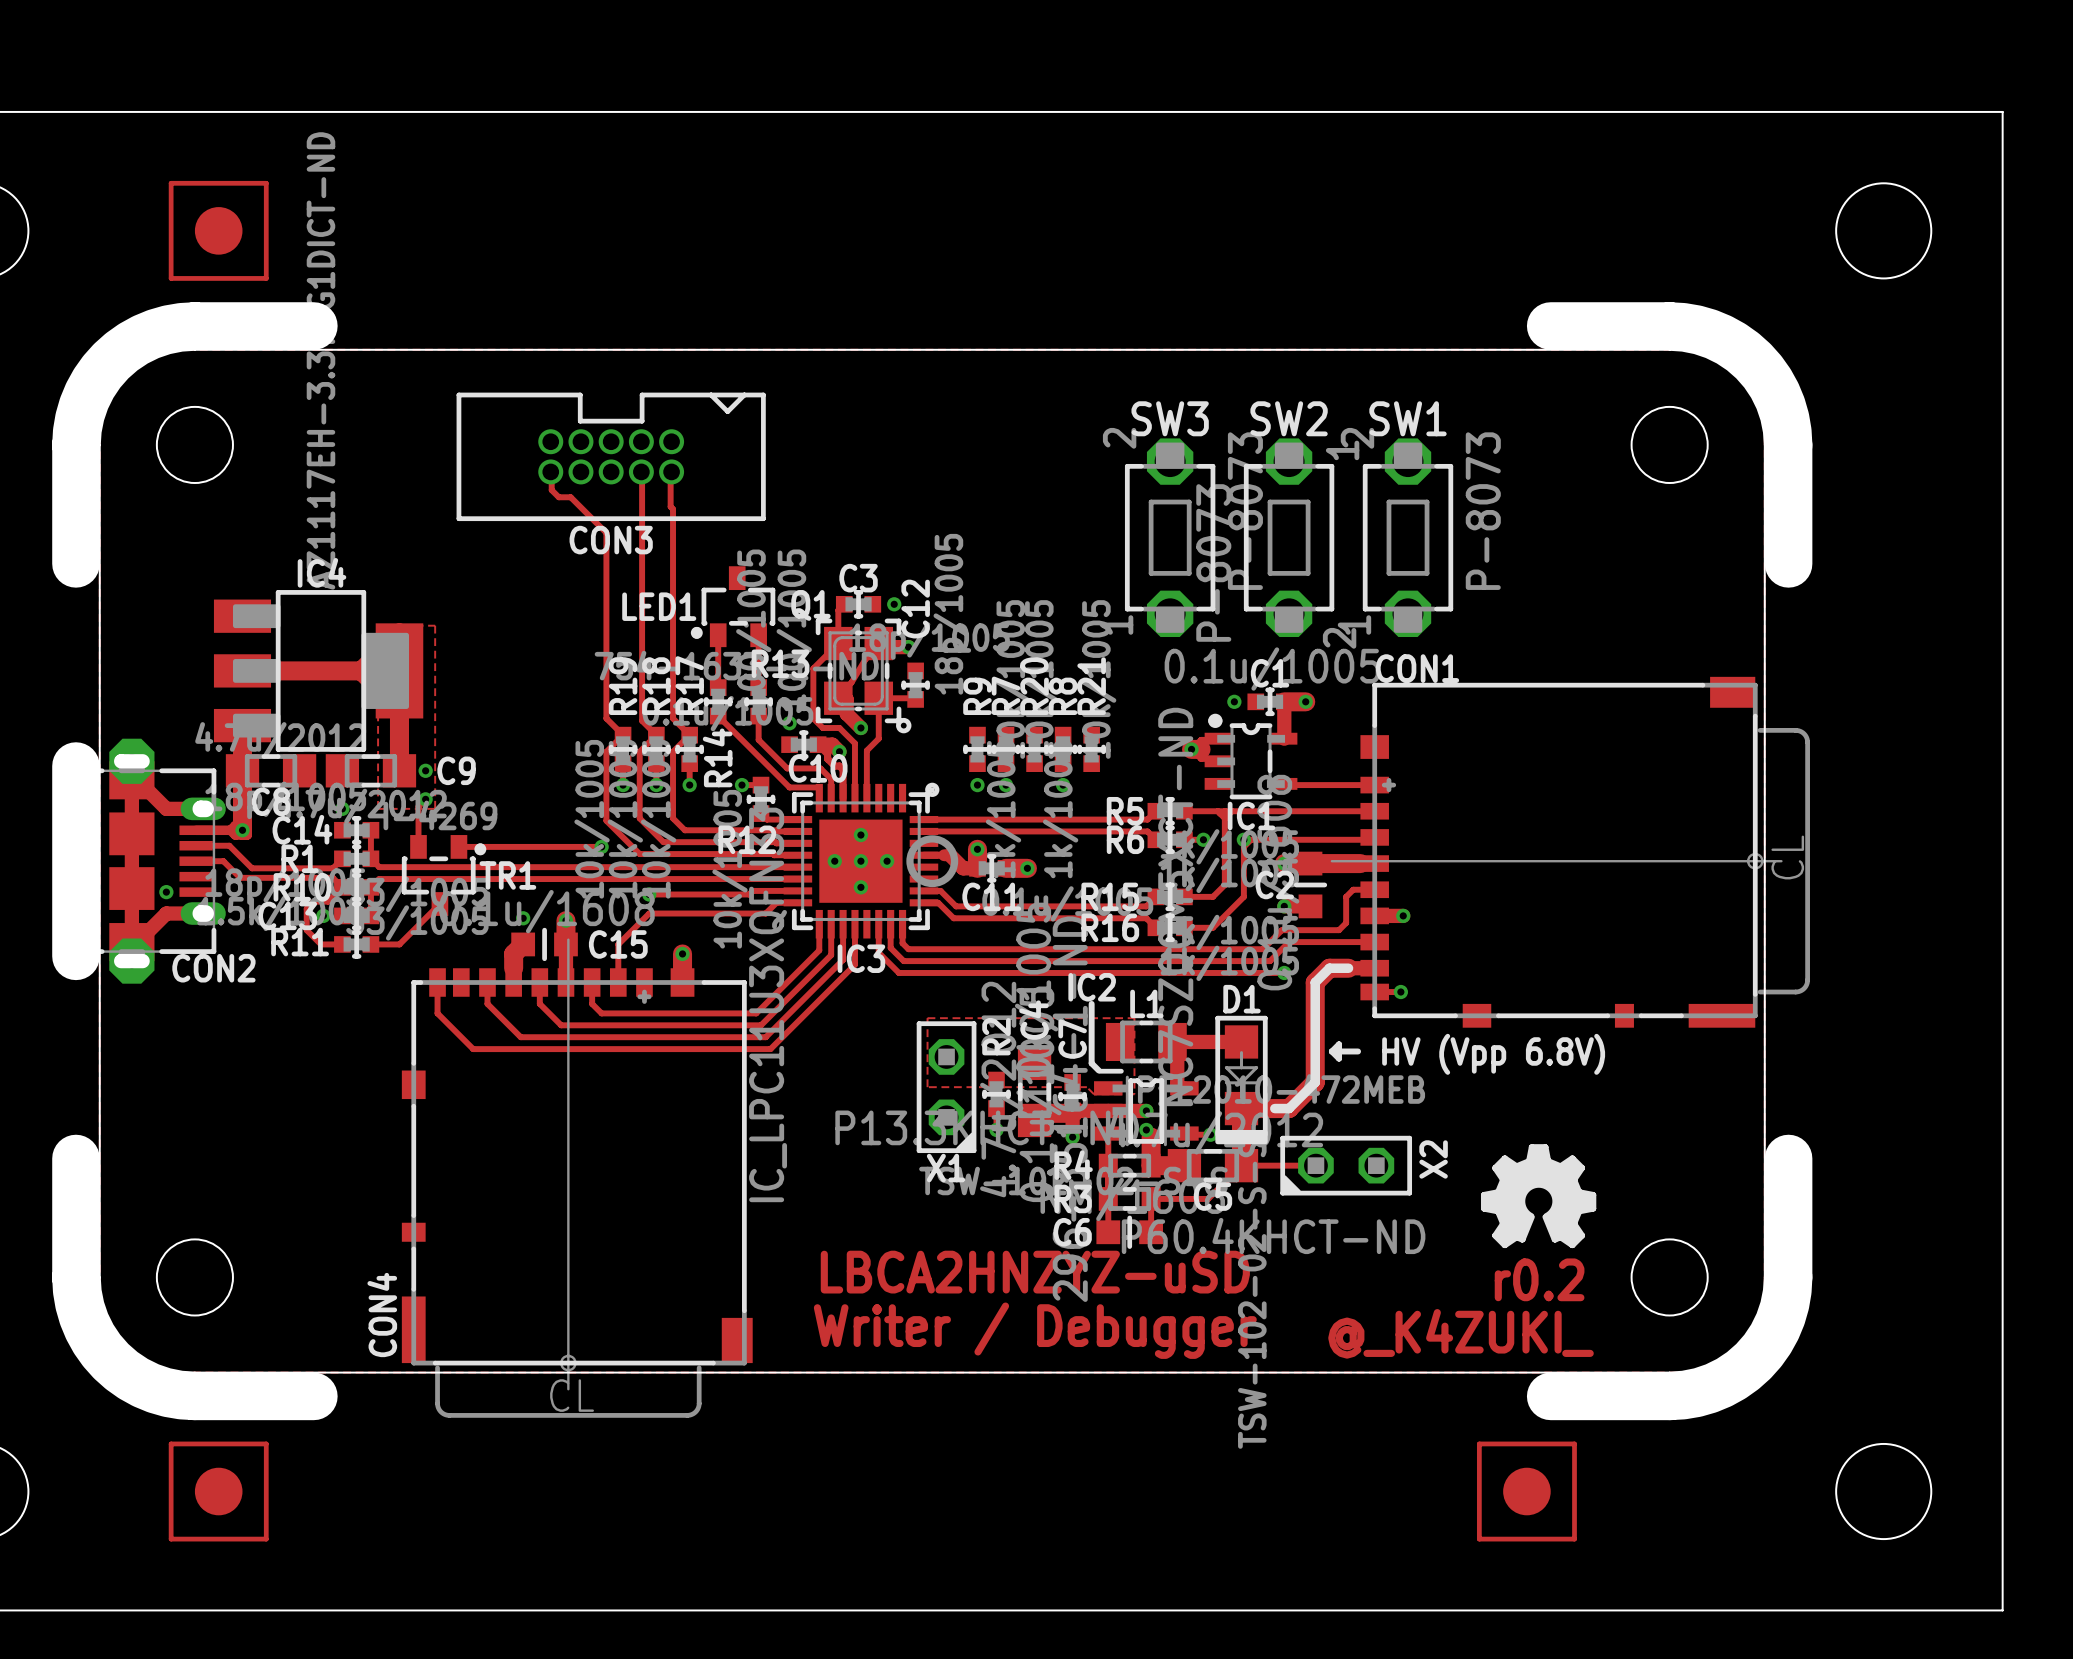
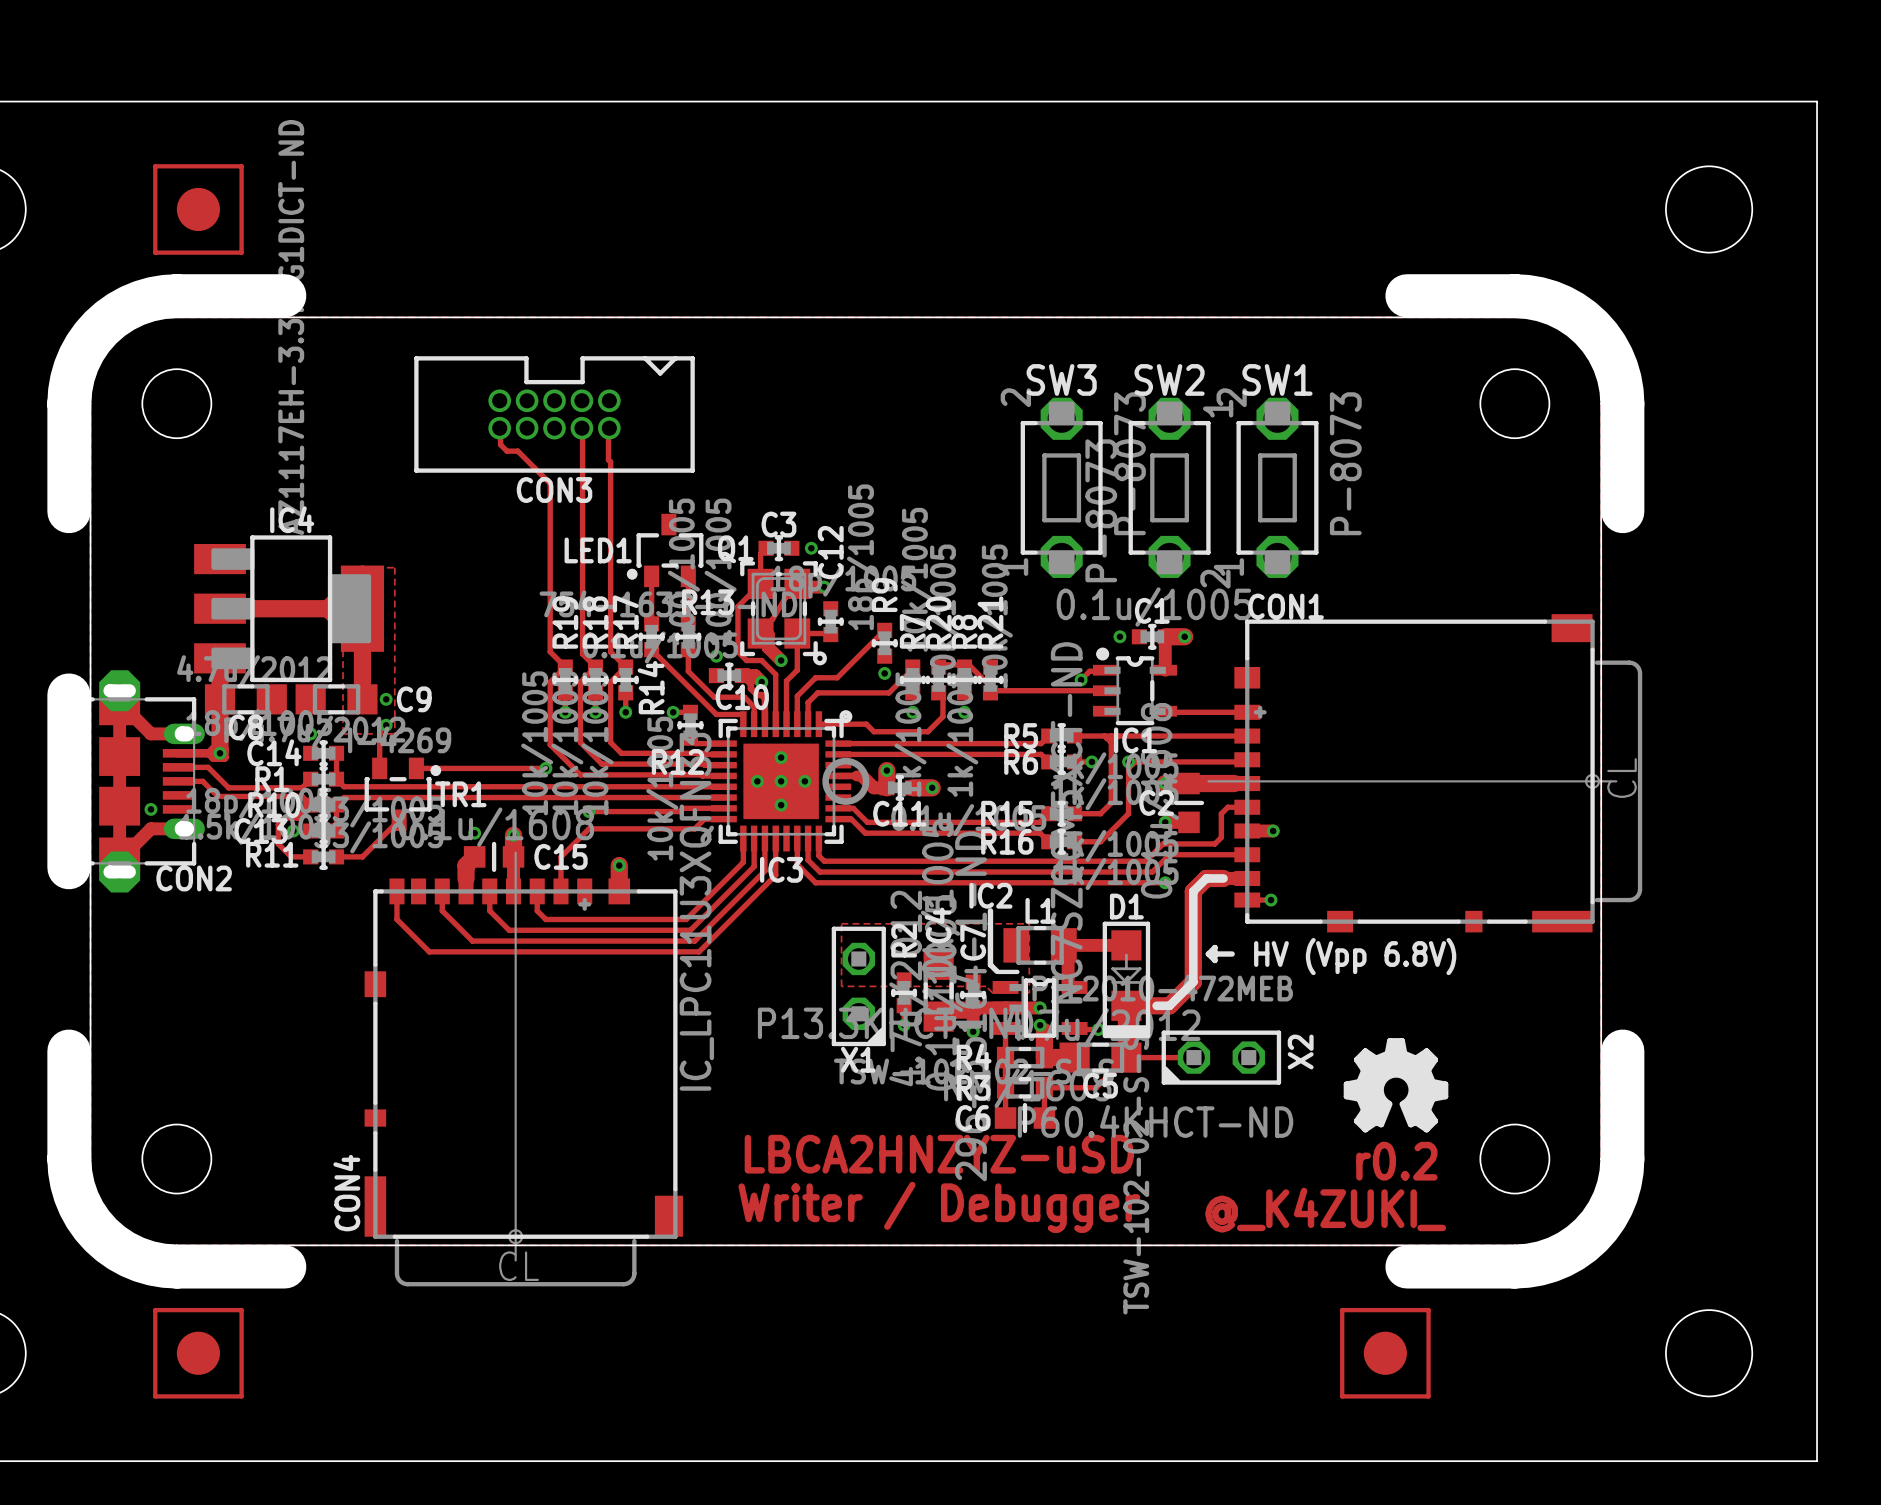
track: none -> (884, 630) (837, 677) (815, 677) (797, 696) (797, 724)
track: none -> (917, 664) (889, 692) (817, 692) (808, 702) (808, 724)
track: none -> (942, 664) (968, 664) (994, 690) (1104, 690)
R9 position: (977, 749) -> (884, 643)
track: (1201, 749) (1191, 749) (1201, 758) (1215, 758) (1217, 761) (1217, 758) -> none
track: none -> (942, 690) (942, 716) (927, 731) (873, 731) (866, 724) (818, 724)
via position: (977, 785) -> (884, 673)

